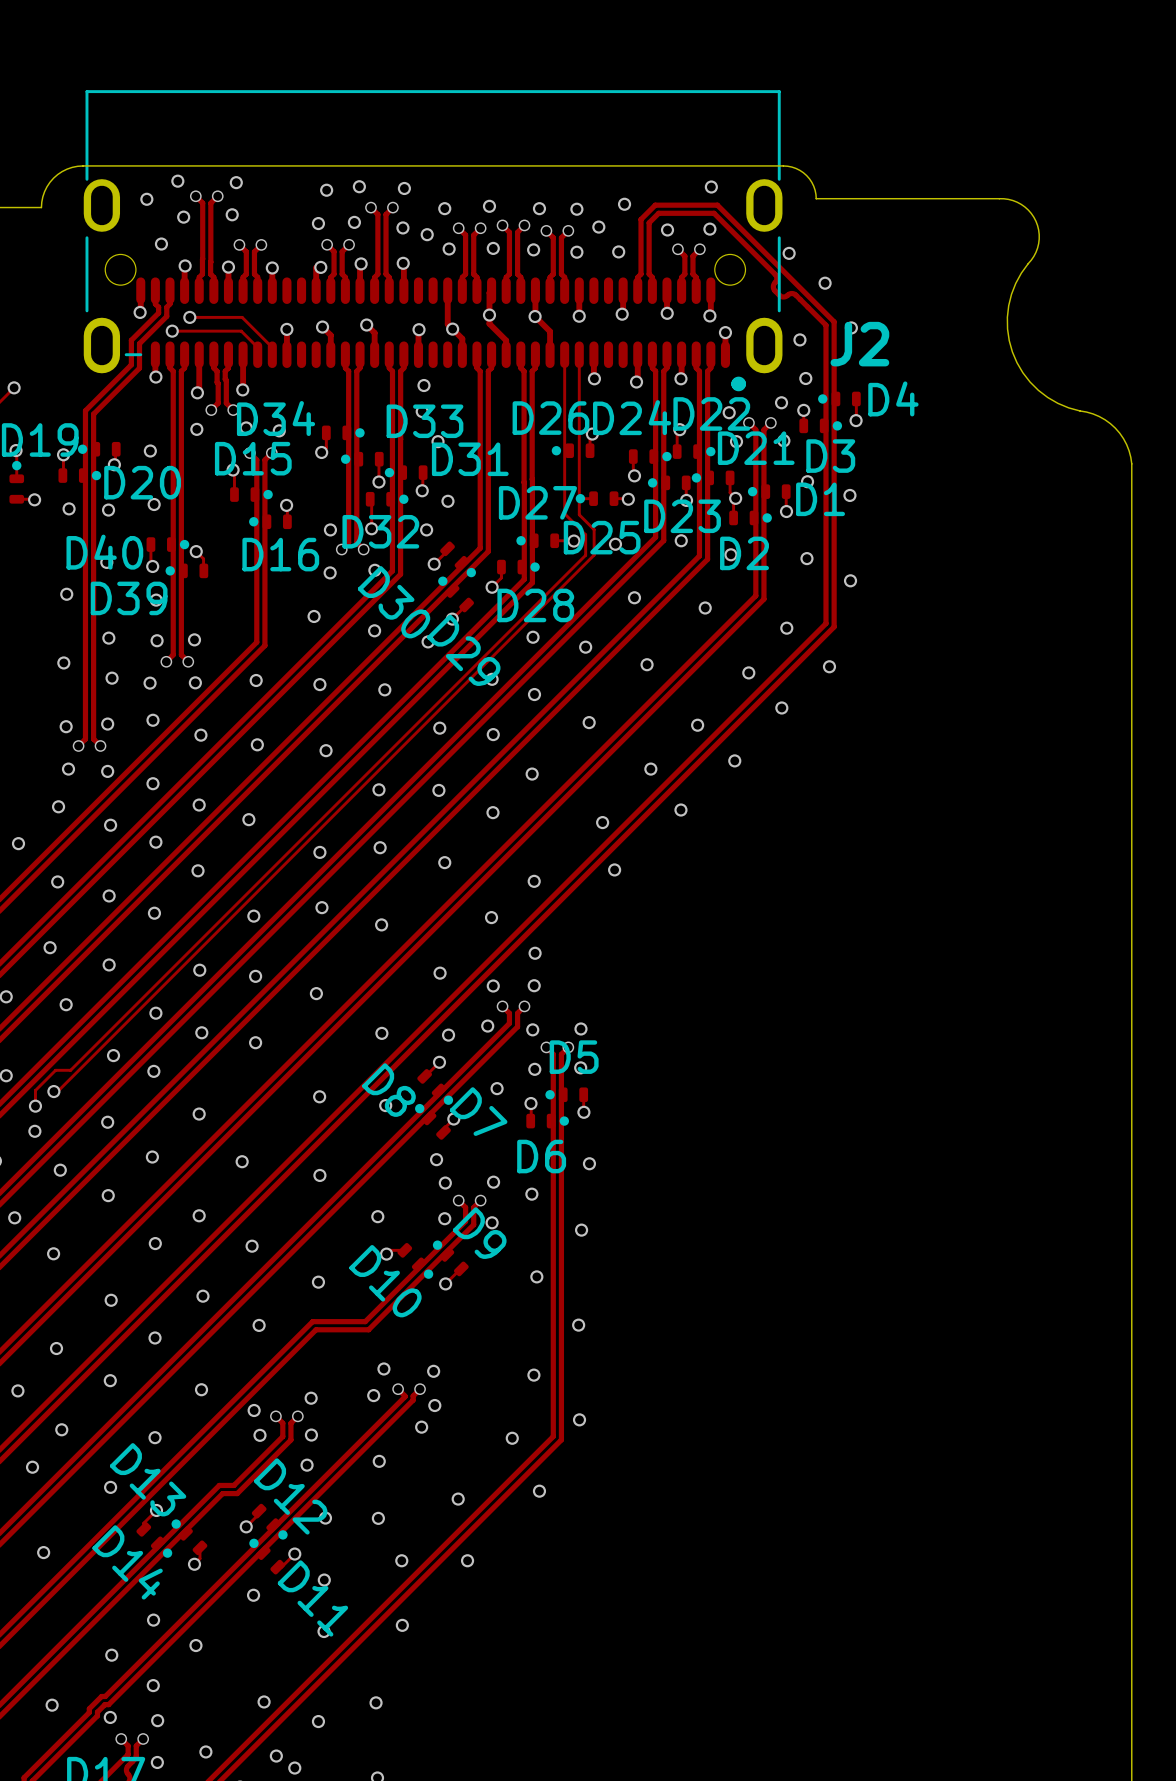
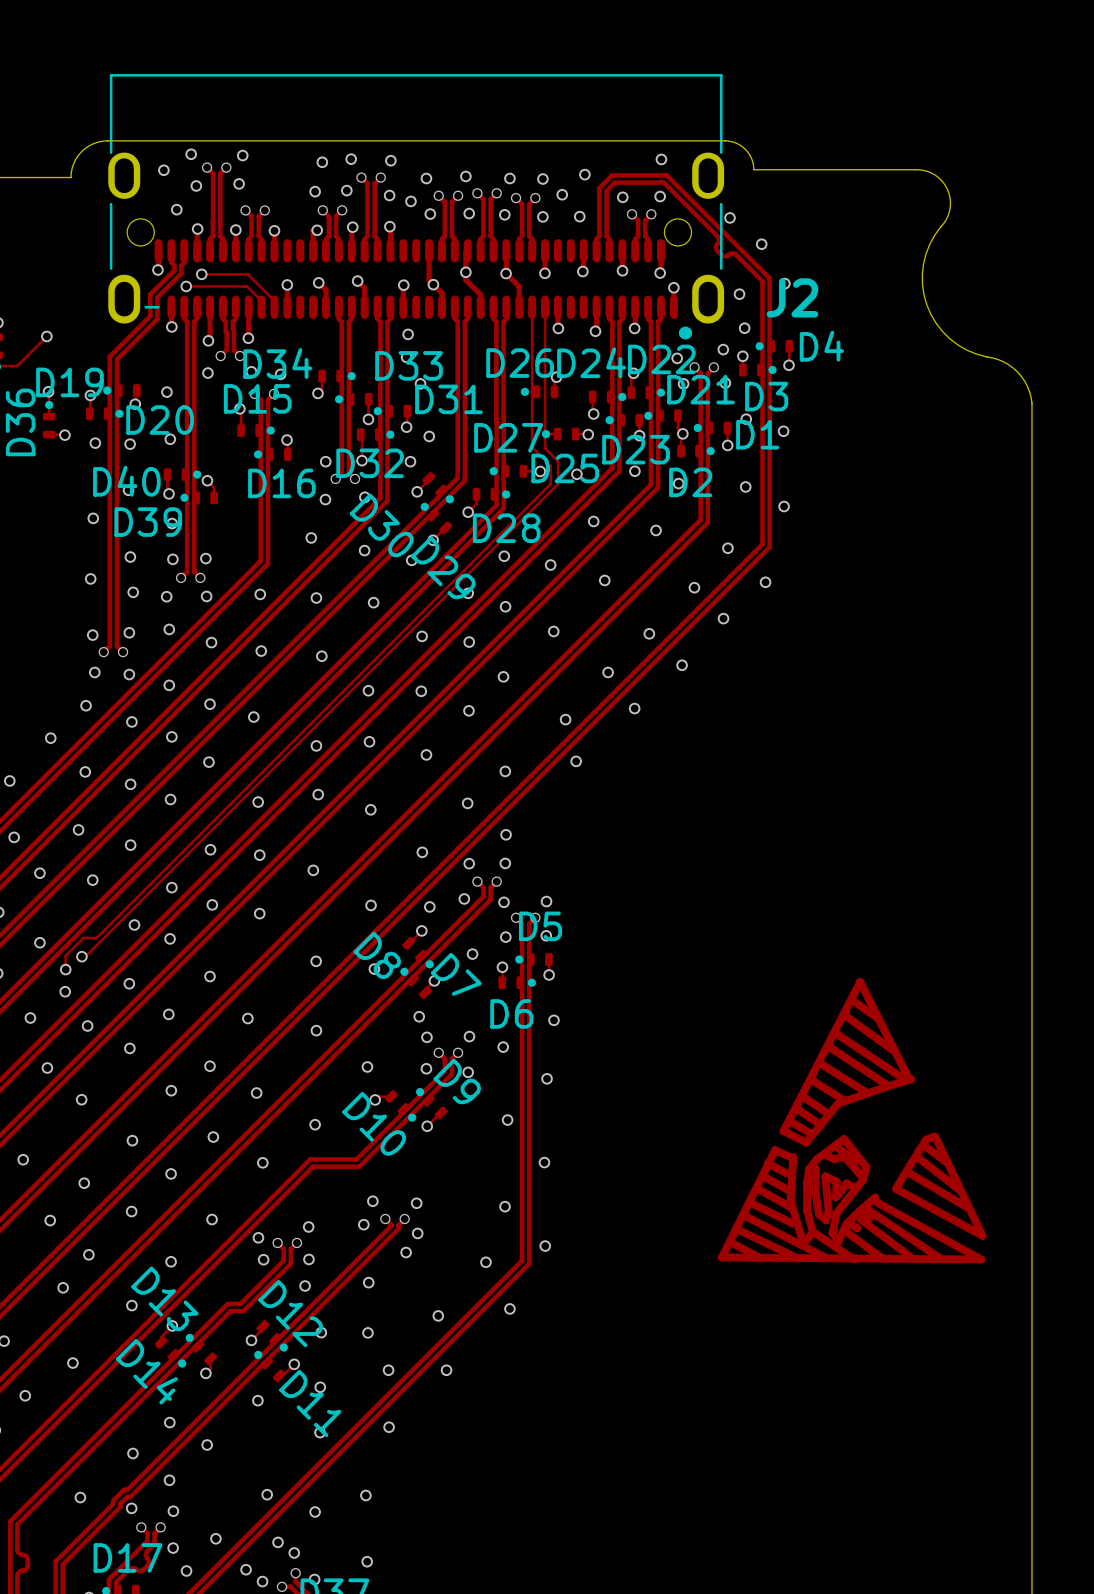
drawing: none -> [718, 978, 987, 1264]

